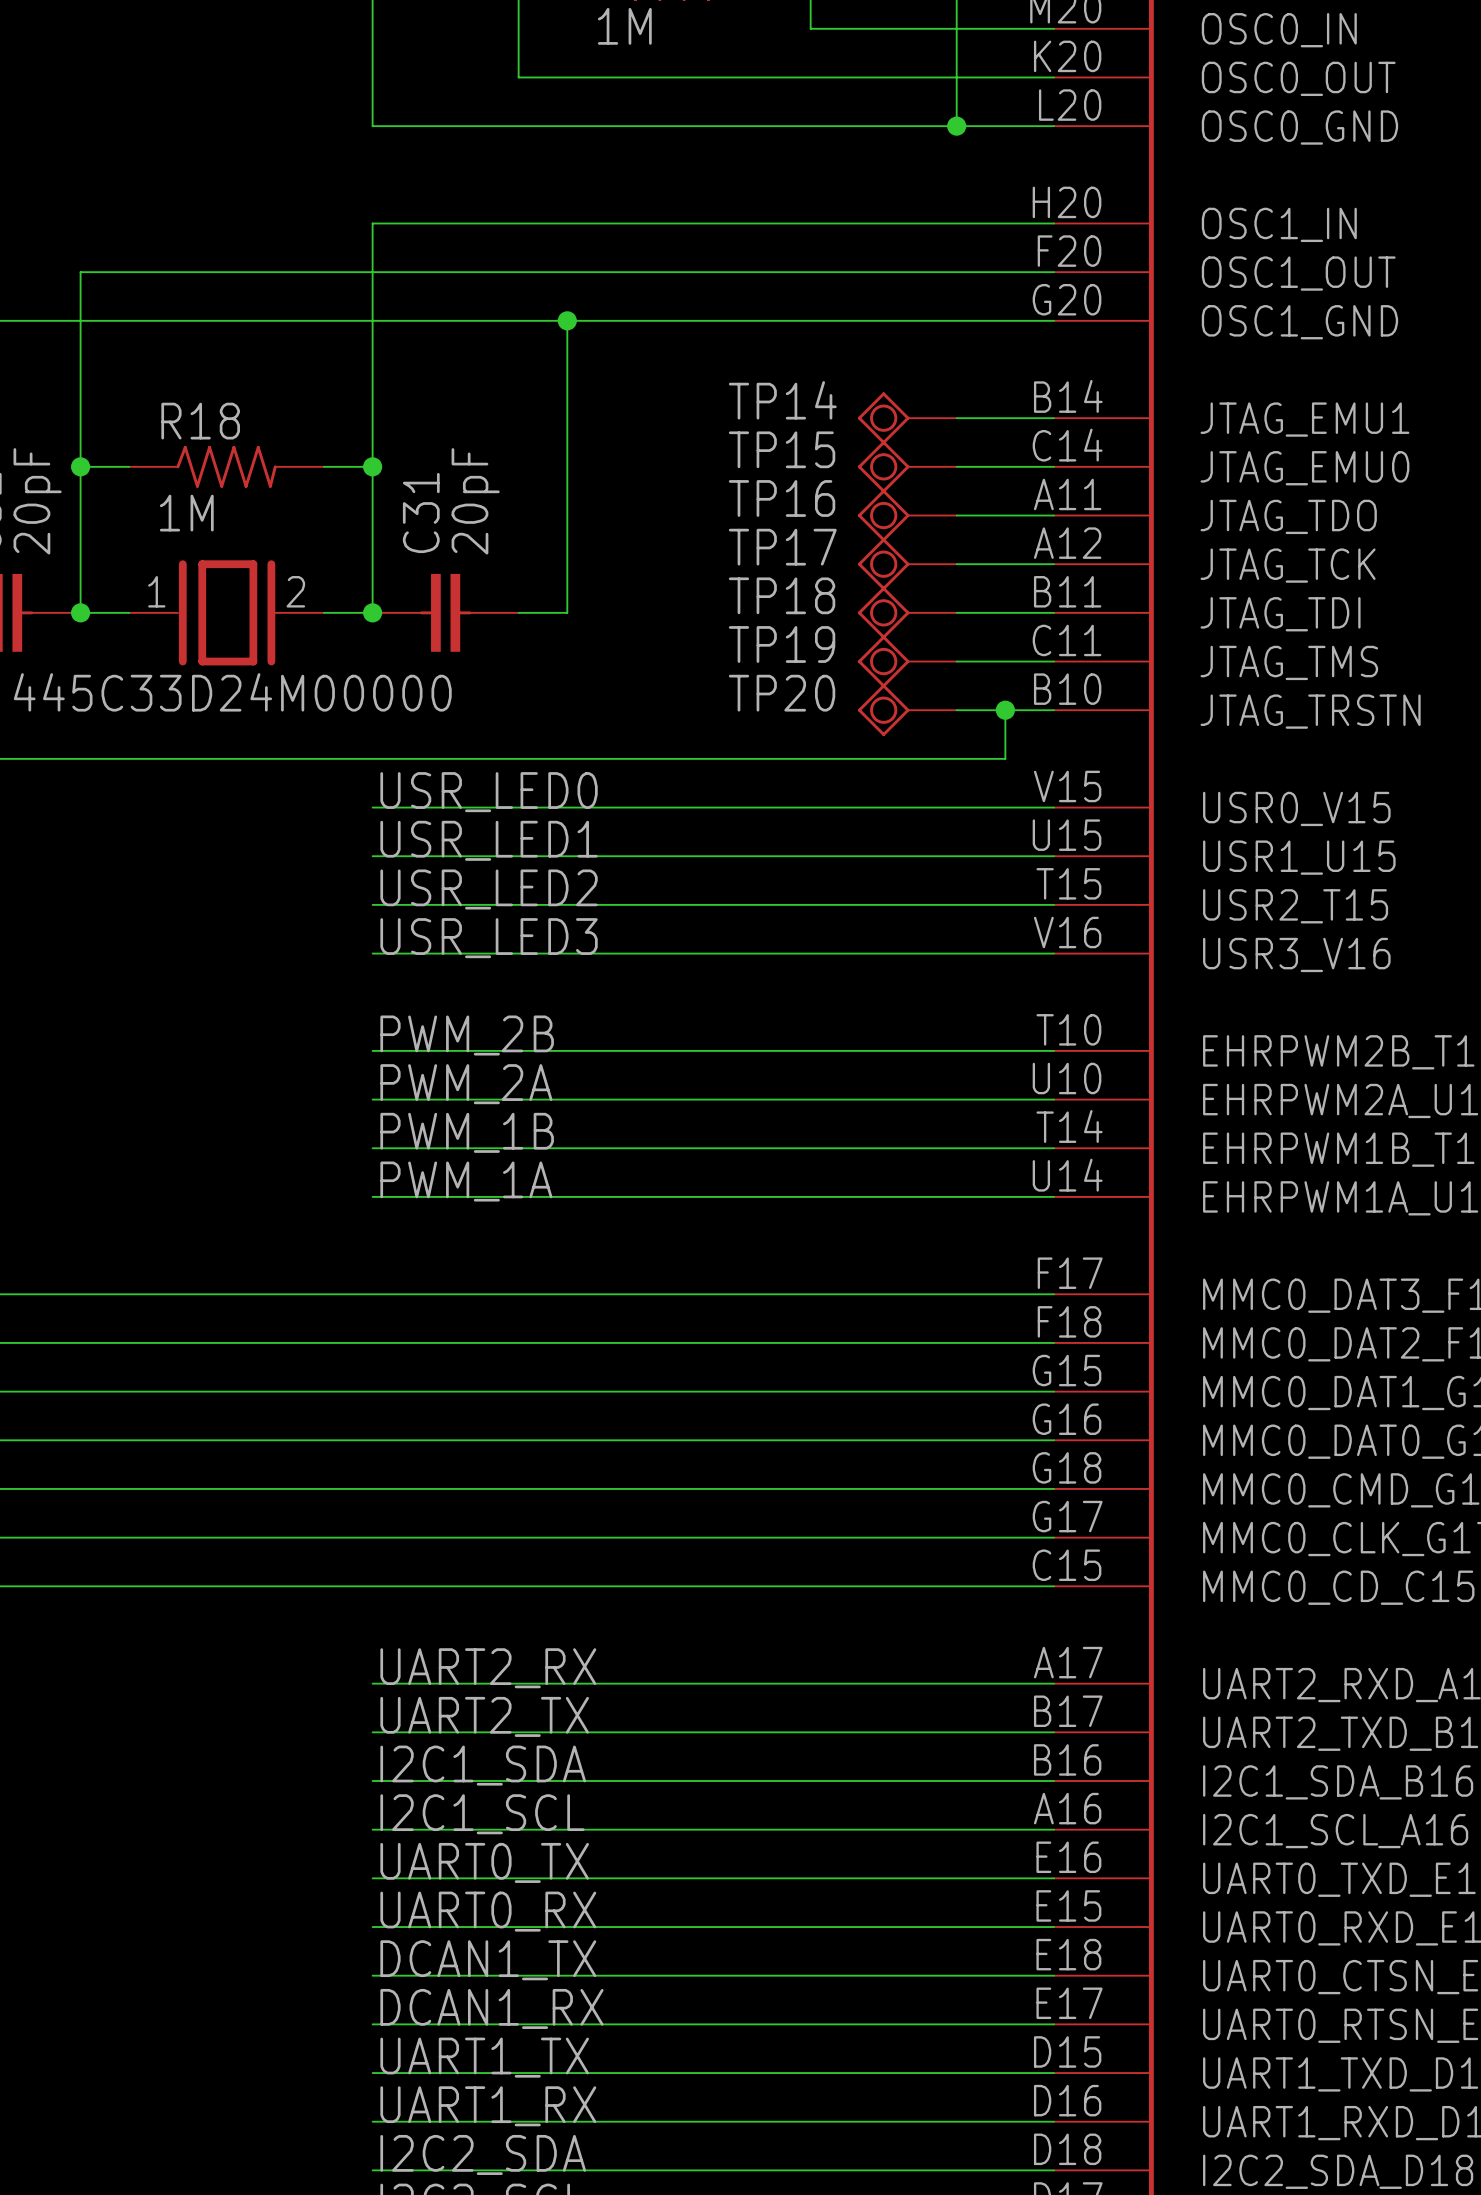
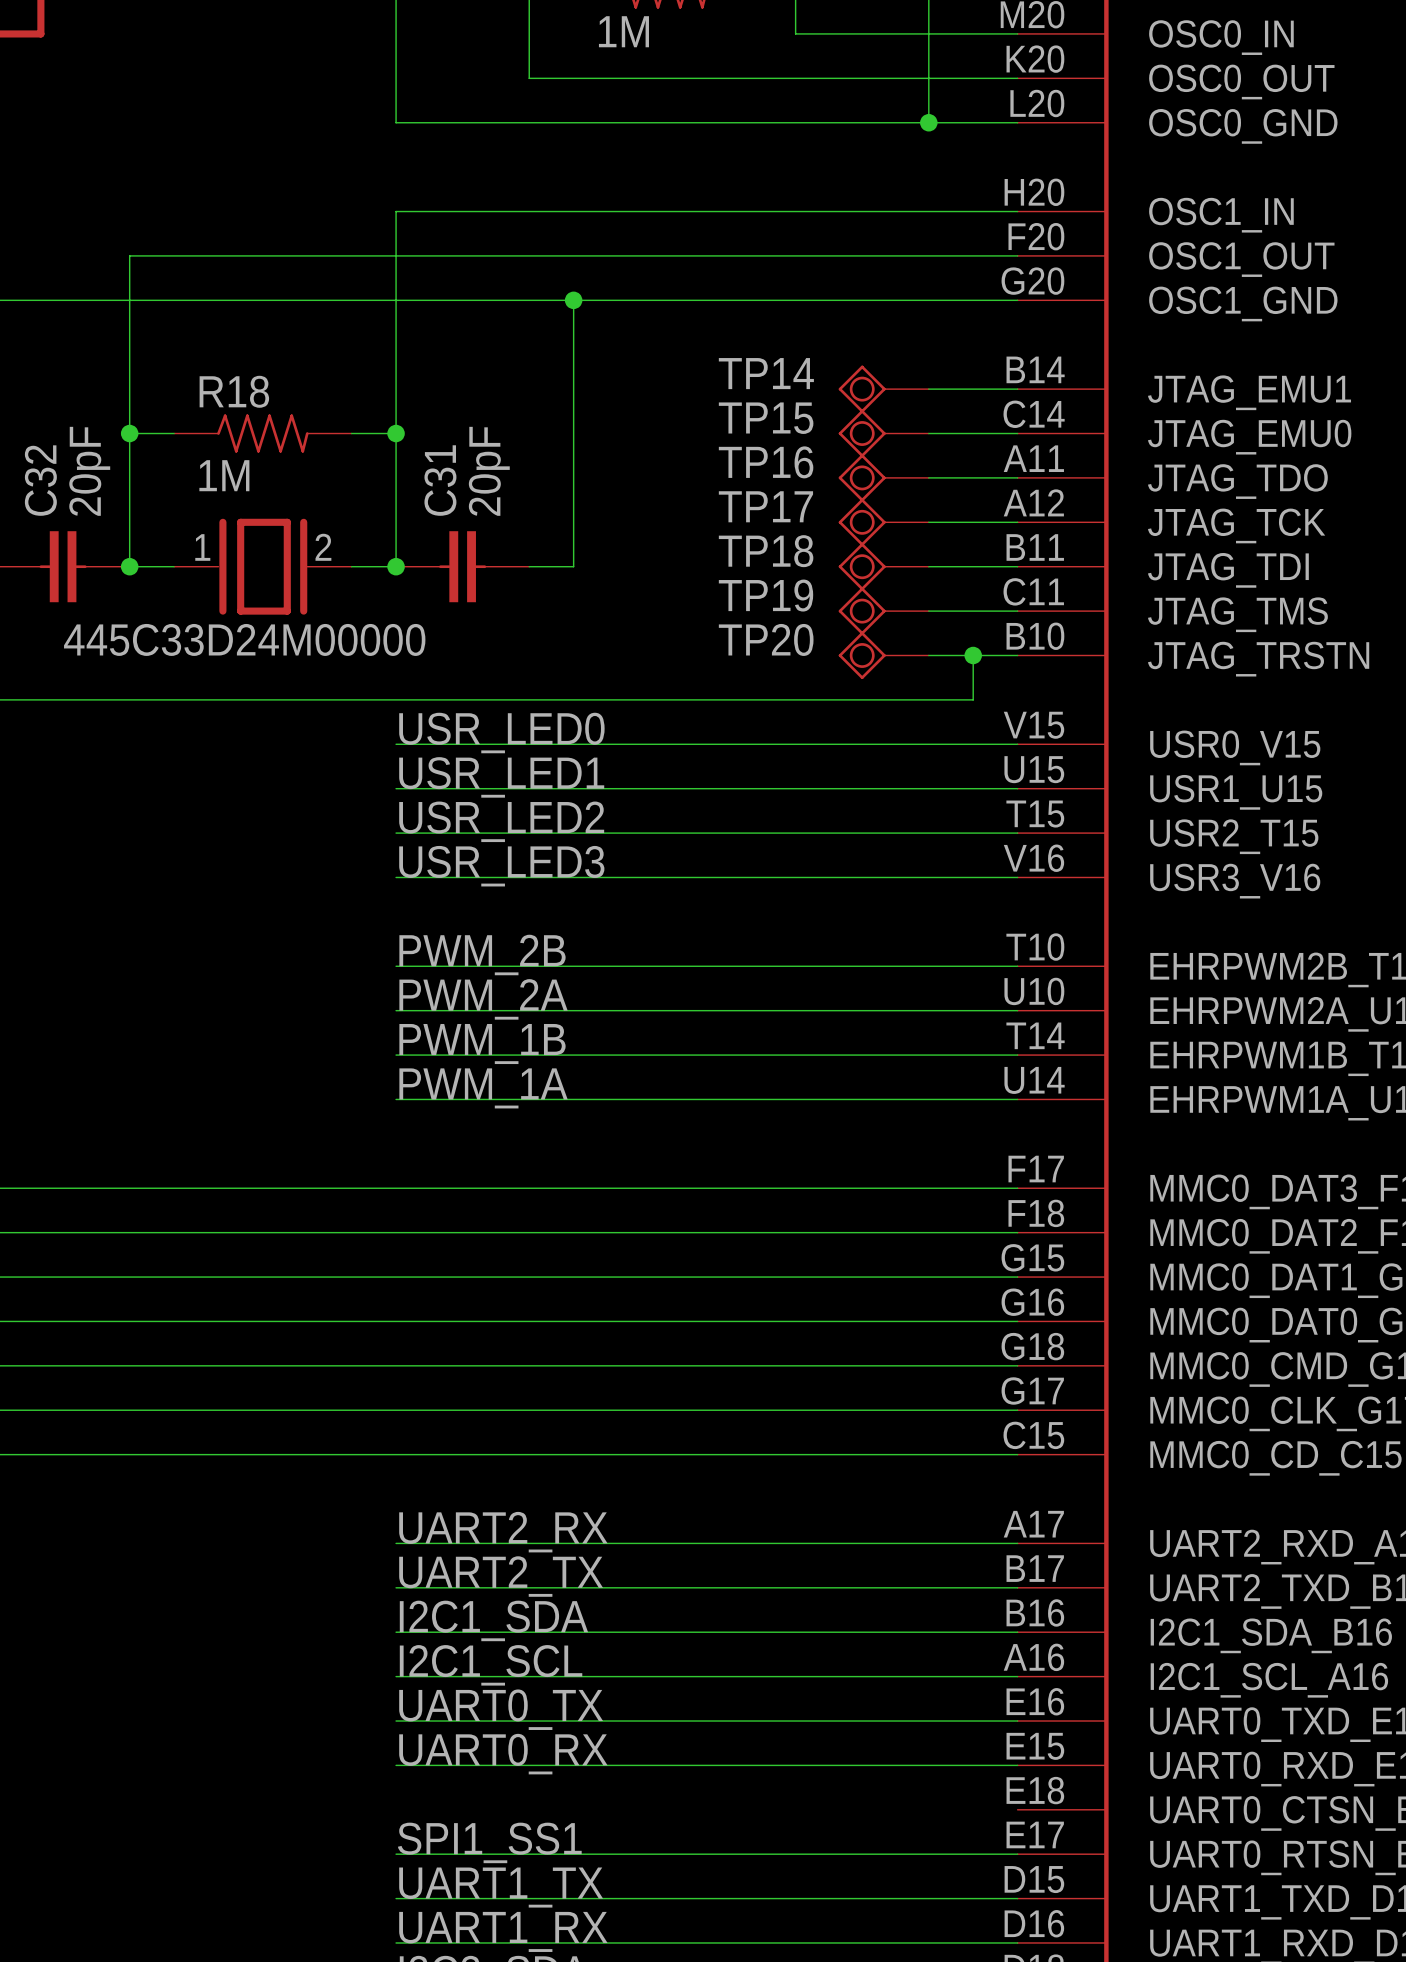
label: DCAN1_TX (488, 1960) -> none
wire: (372, 1975) (1054, 1975) -> none
label: DCAN1_RX (491, 2008) -> SPI1_SS1 (489, 1842)

